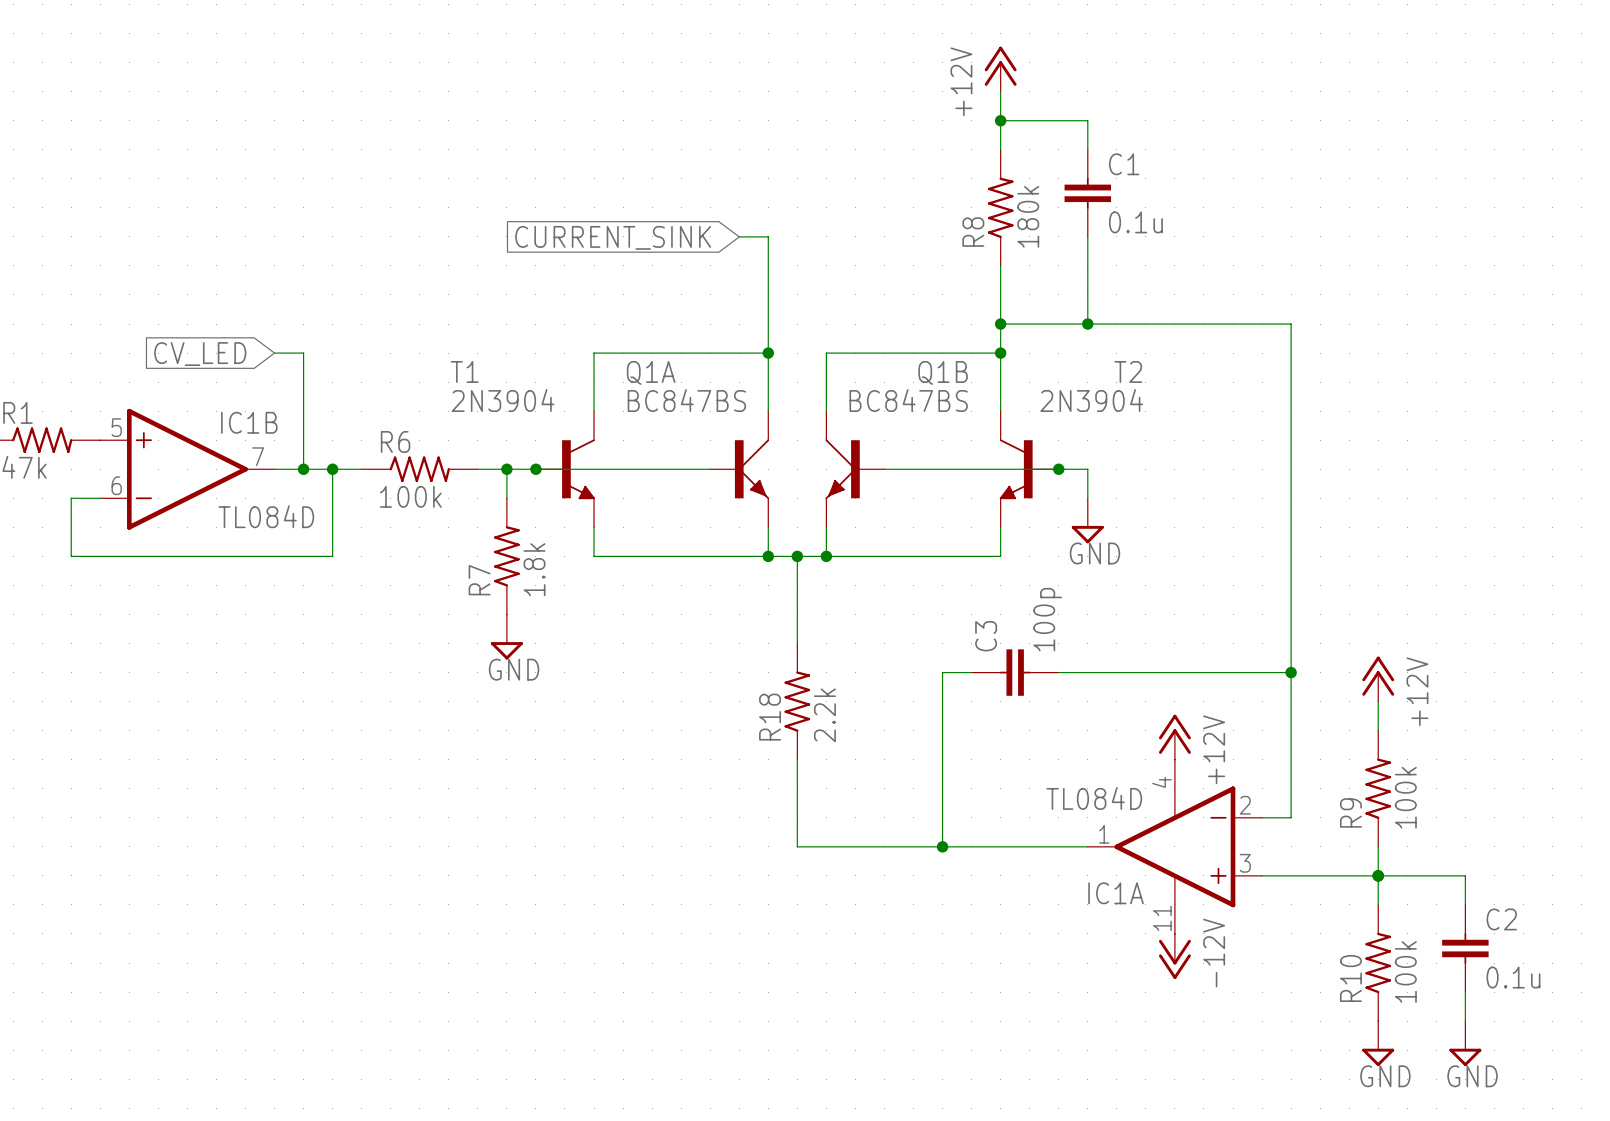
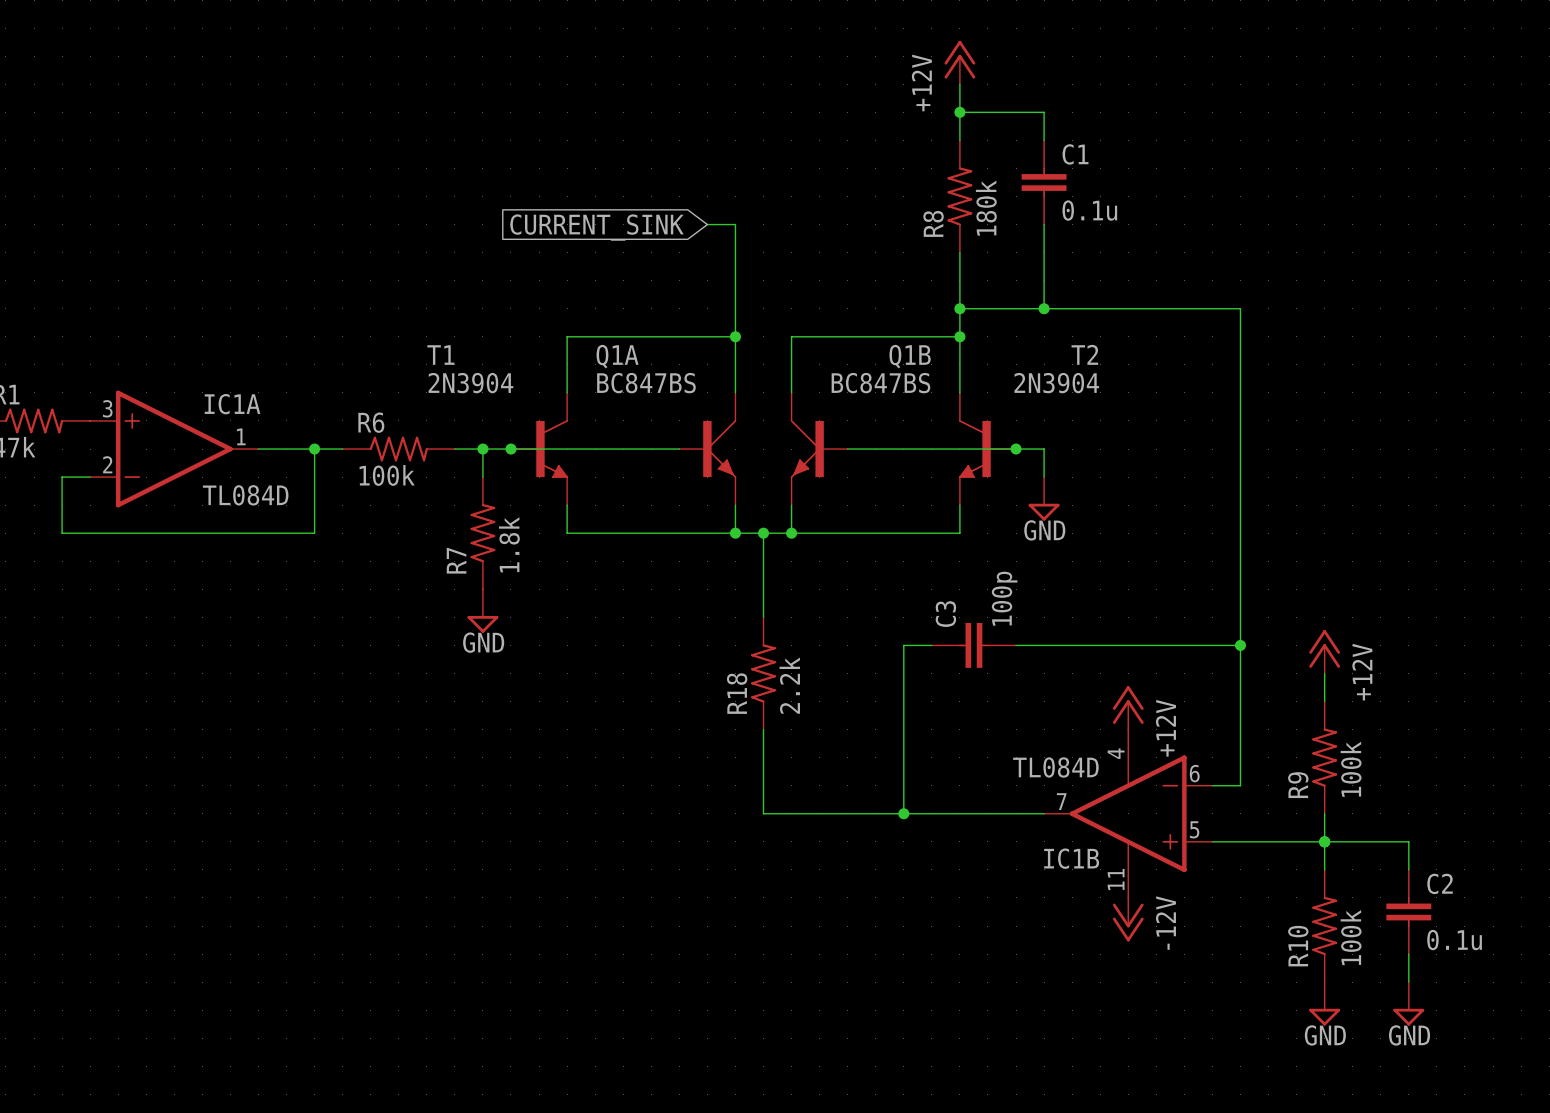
wire: (274, 353) (303, 353) (303, 469) -> none
global label: CV_LED (200, 354) -> none
IC1B rotation: 0° (187, 469) -> 180° (1128, 813)
IC1B position: (187, 469) -> (1128, 813)
junction: (303, 469) -> none
IC1A rotation: 0° (1174, 846) -> 180° (174, 449)
IC1A position: (1174, 846) -> (174, 449)

